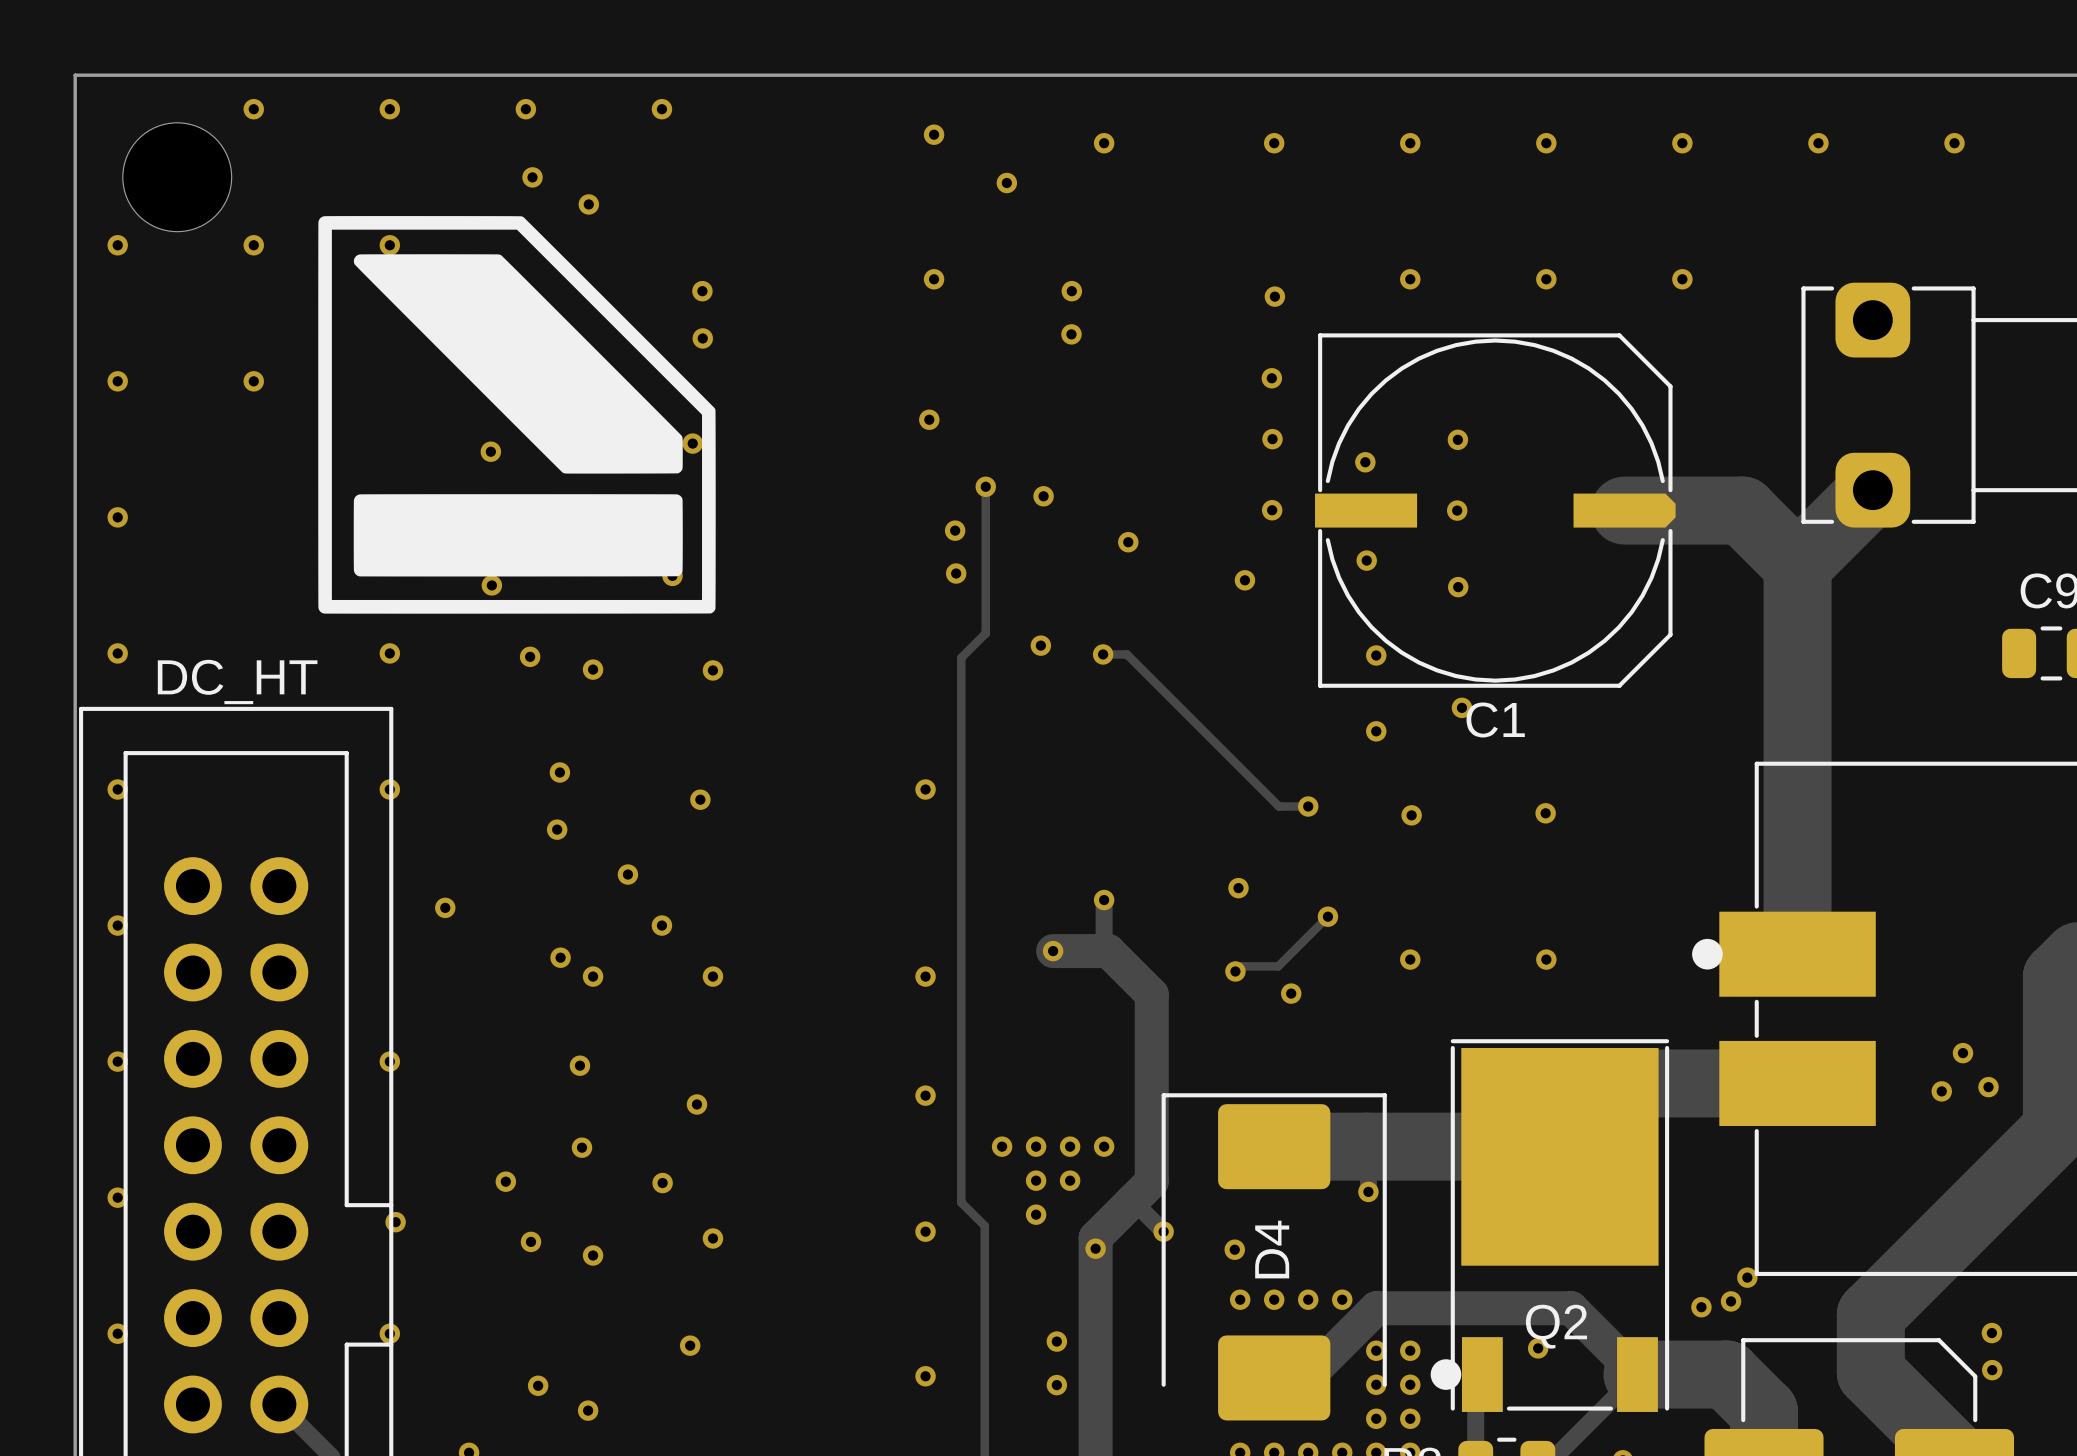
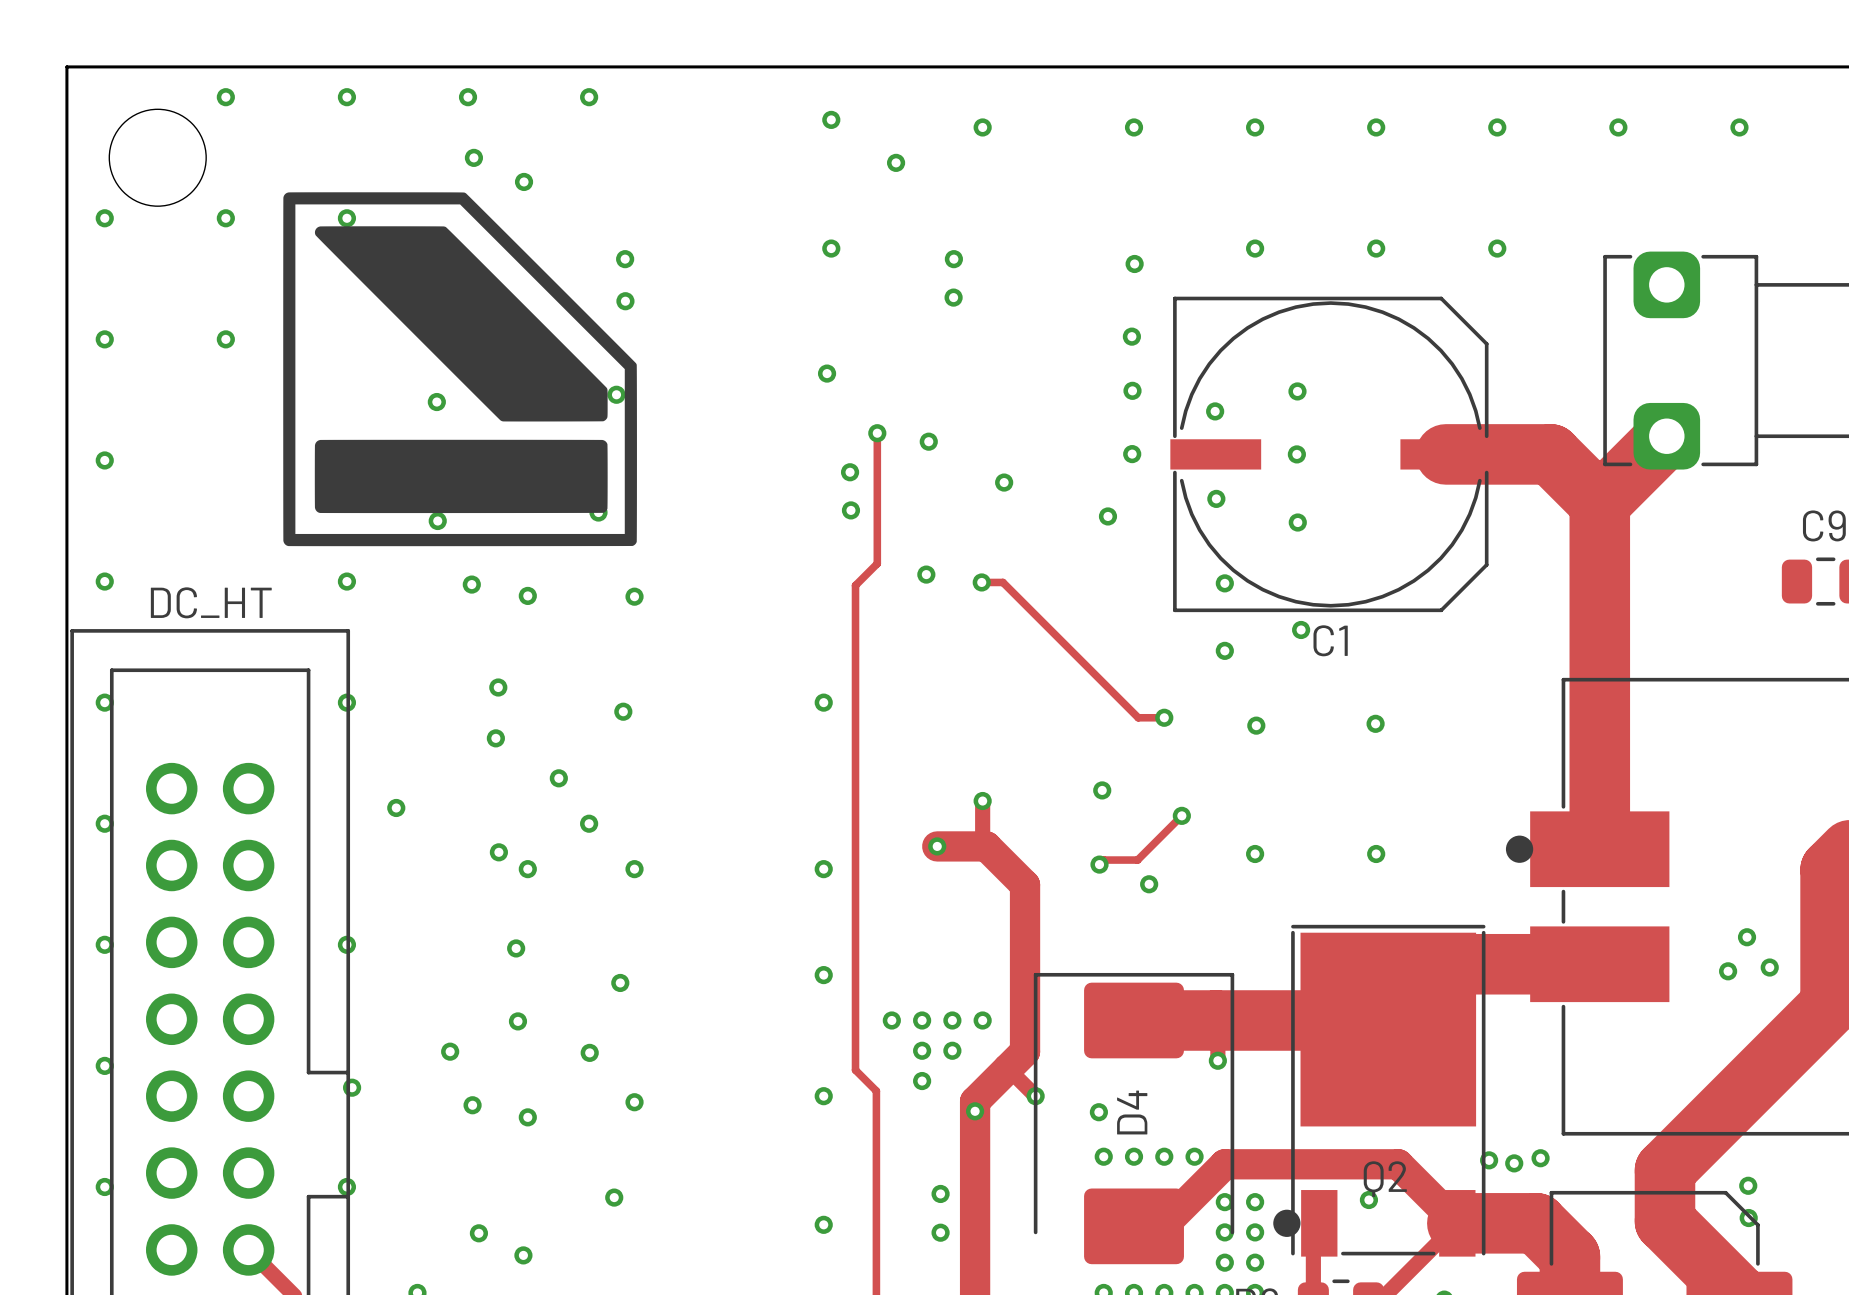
via position: (1747, 1277) -> (1489, 1160)
via: none -> (1748, 1185)
via: (1991, 1333) -> none
via: none -> (1748, 1218)
via: (1992, 1370) -> none

